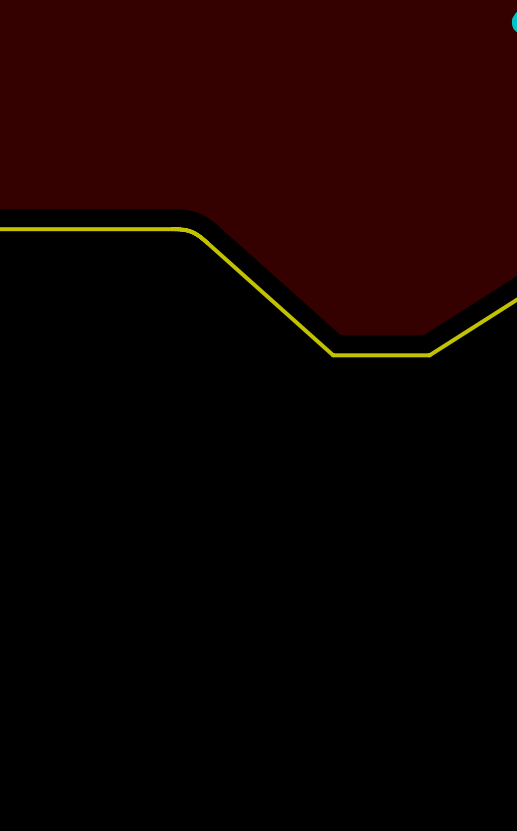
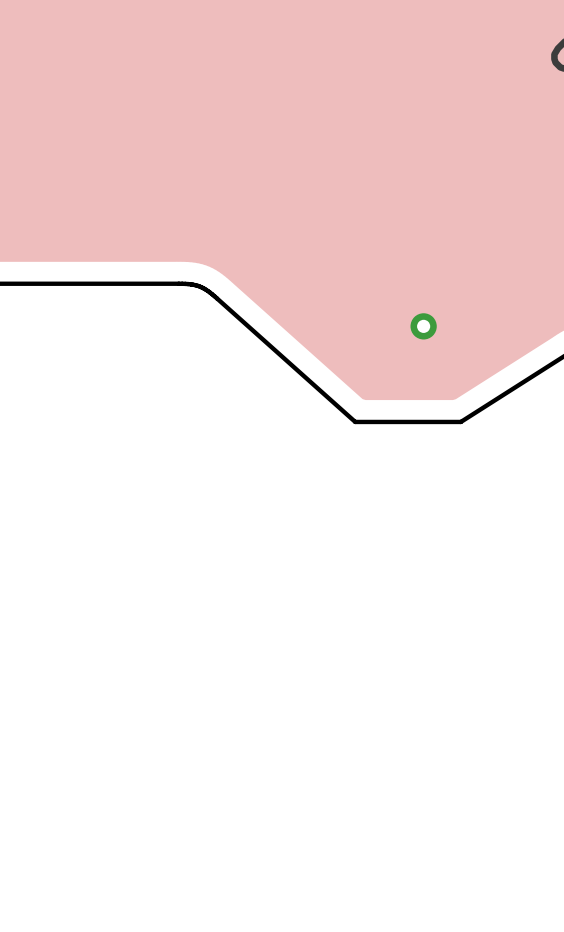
via: none -> (423, 326)

